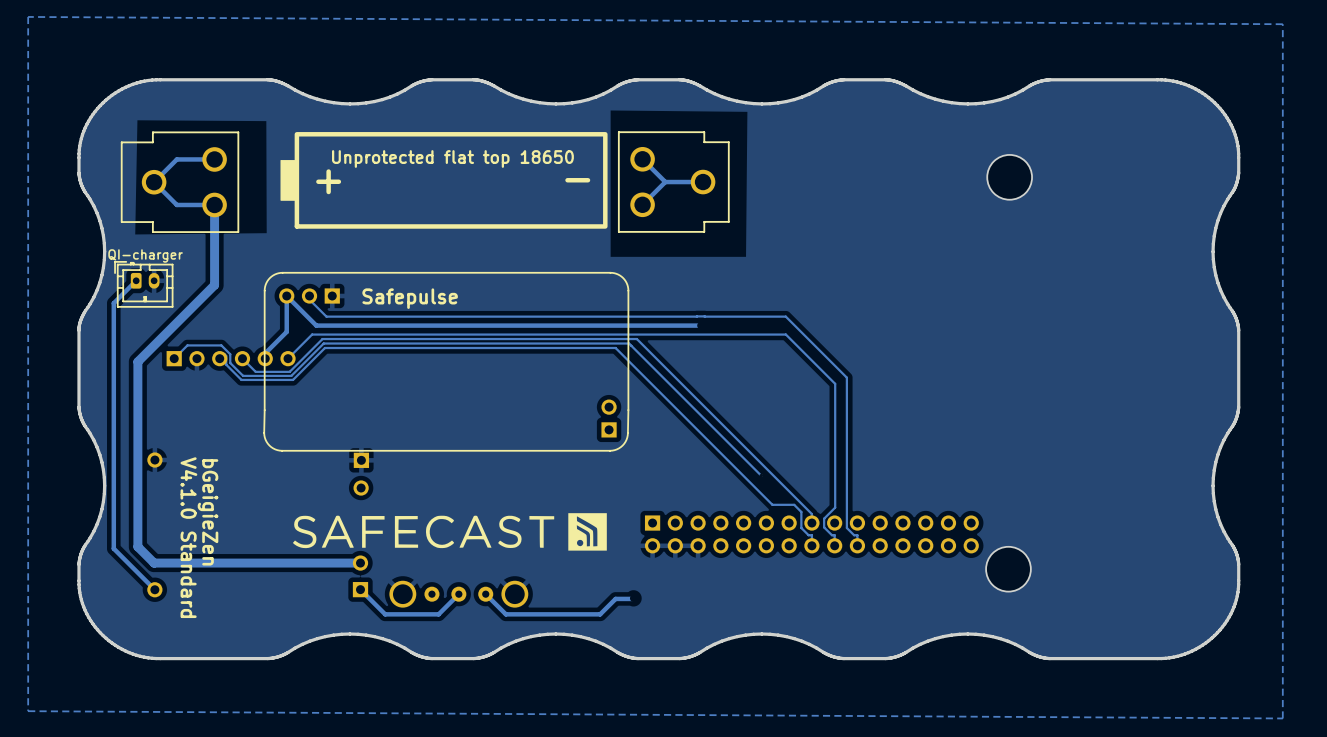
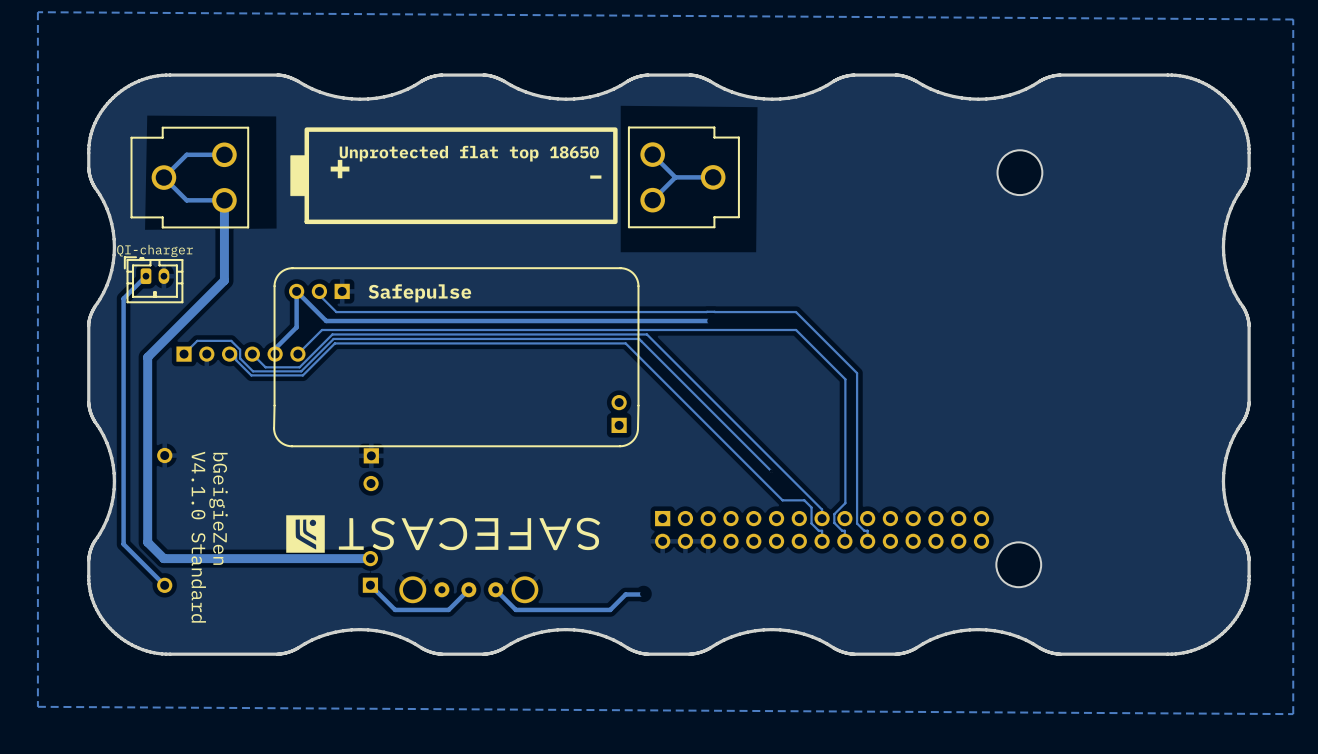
drawing: [292, 513, 607, 551] -> none
drawing: none -> [286, 515, 601, 553]

